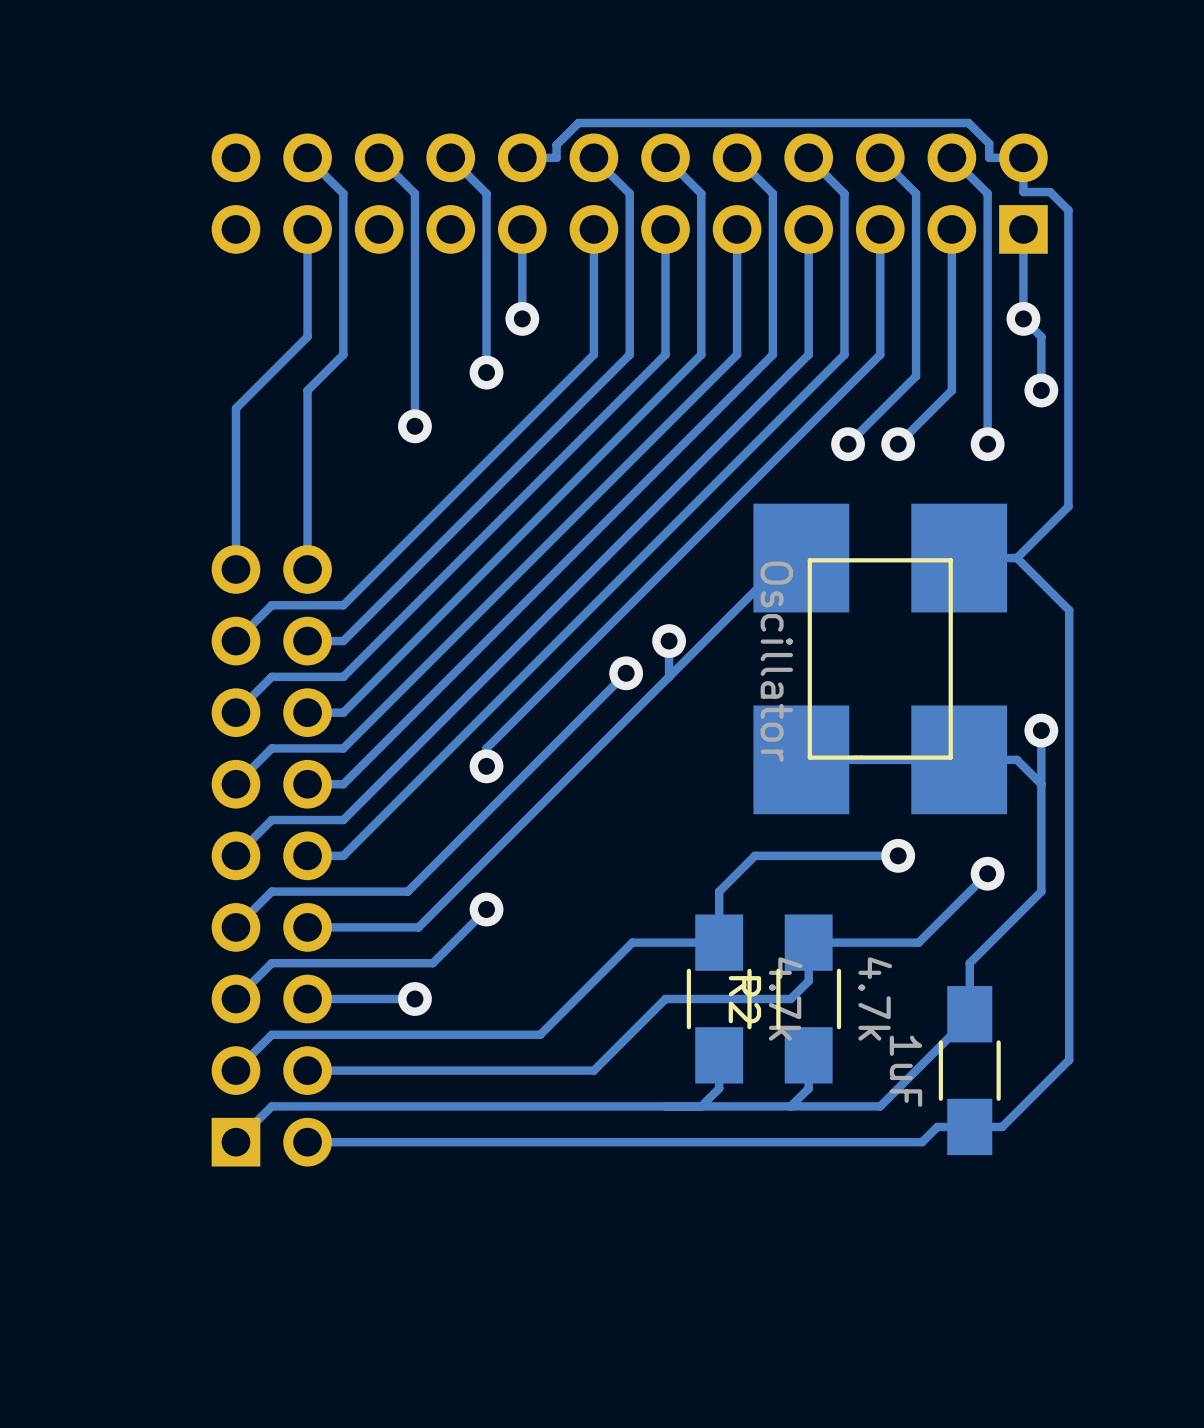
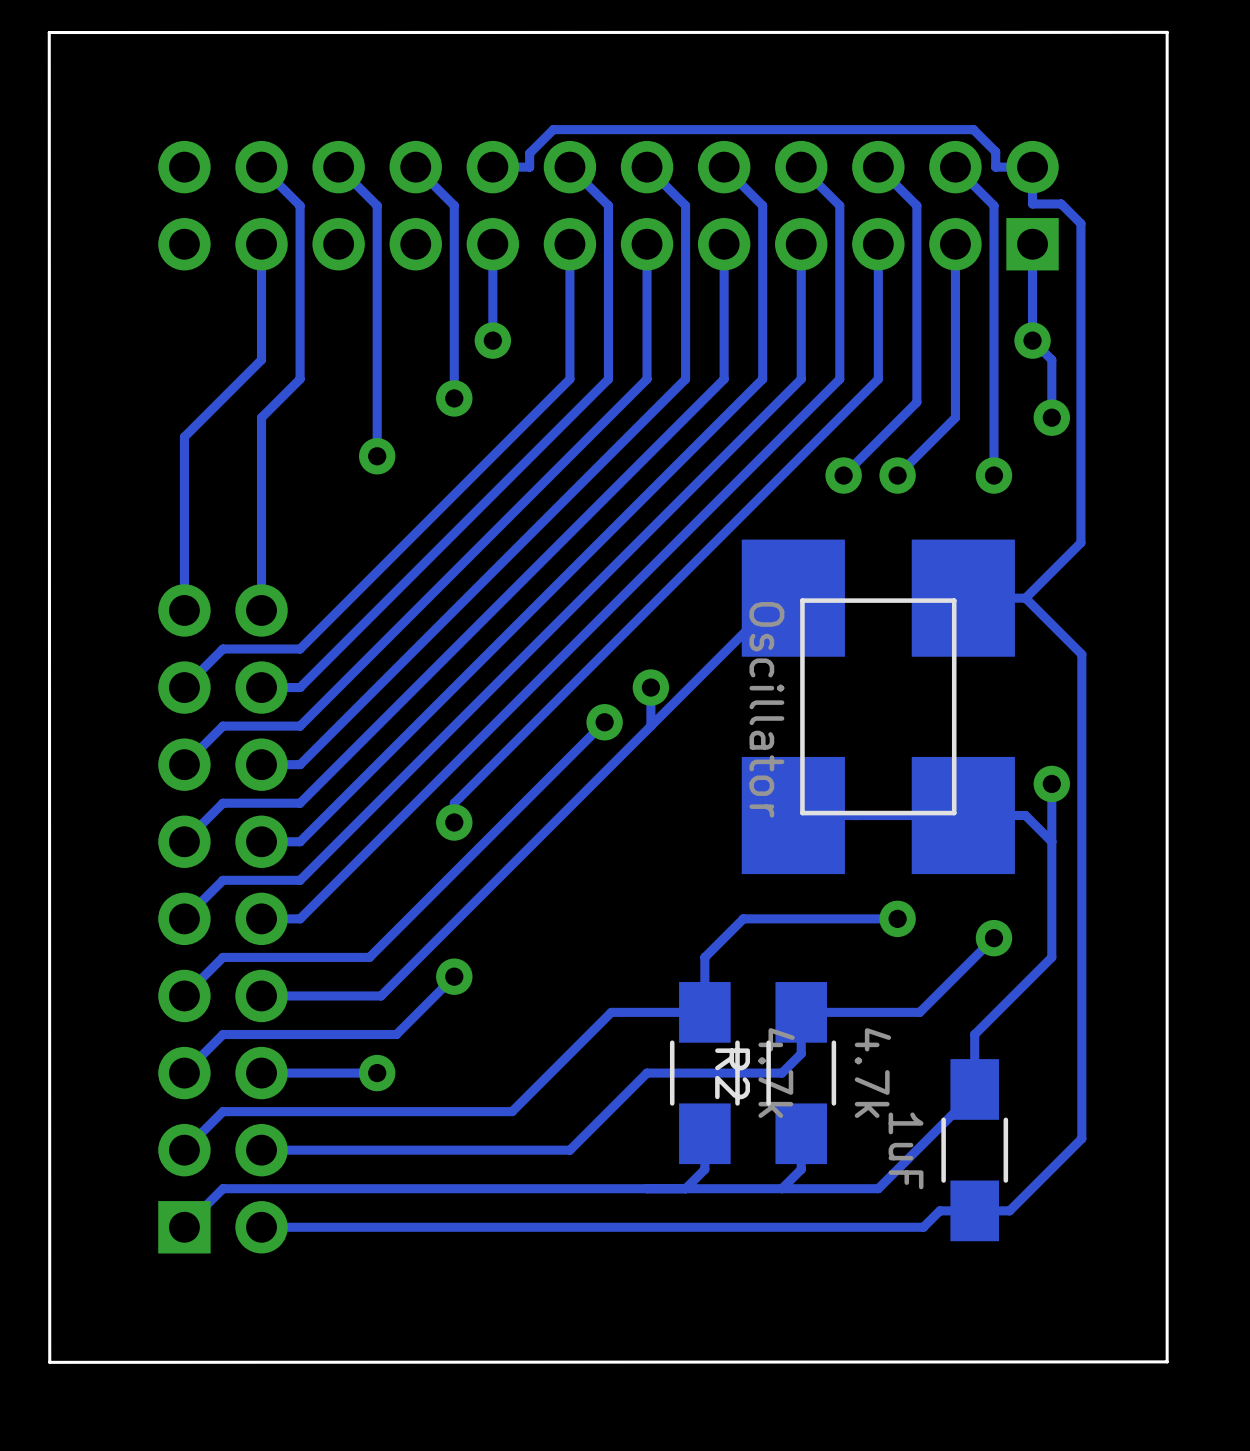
board edge: none -> (1167, 32) (1167, 1361) (49, 1362) (49, 32) (1167, 32)

